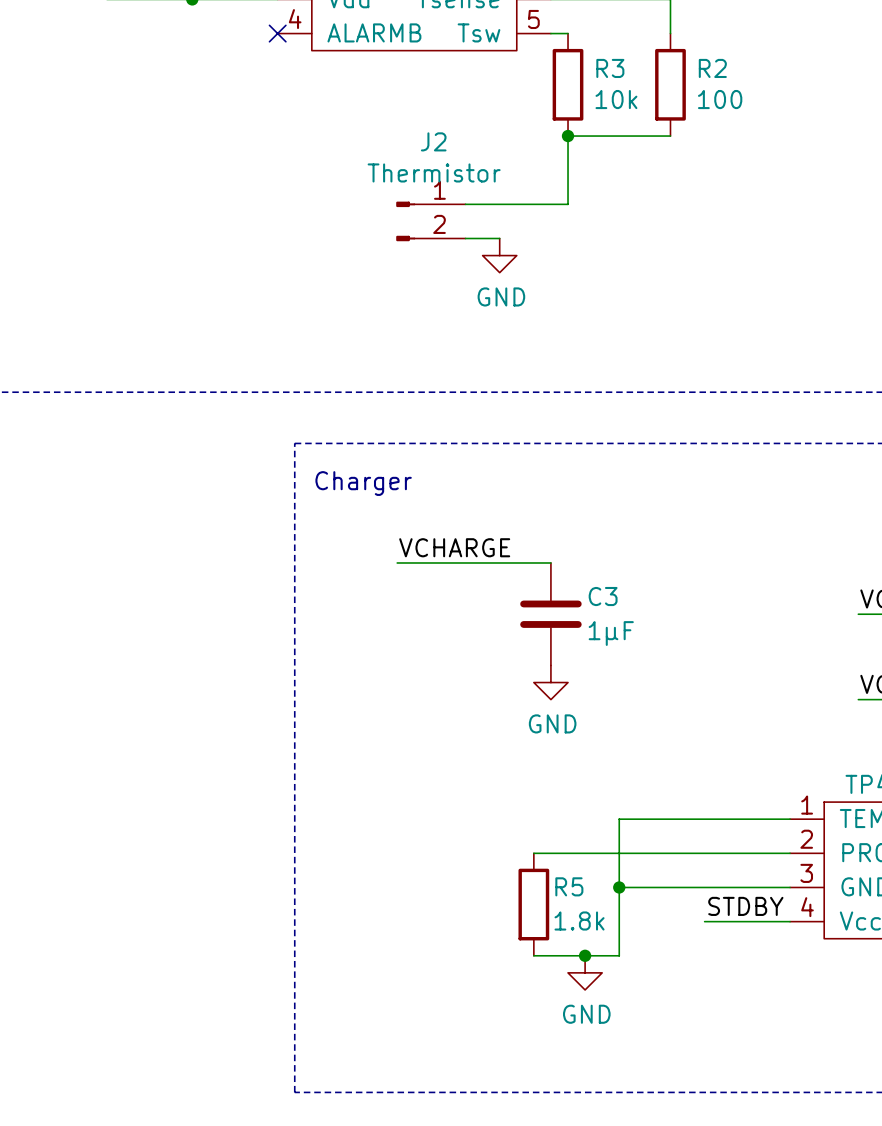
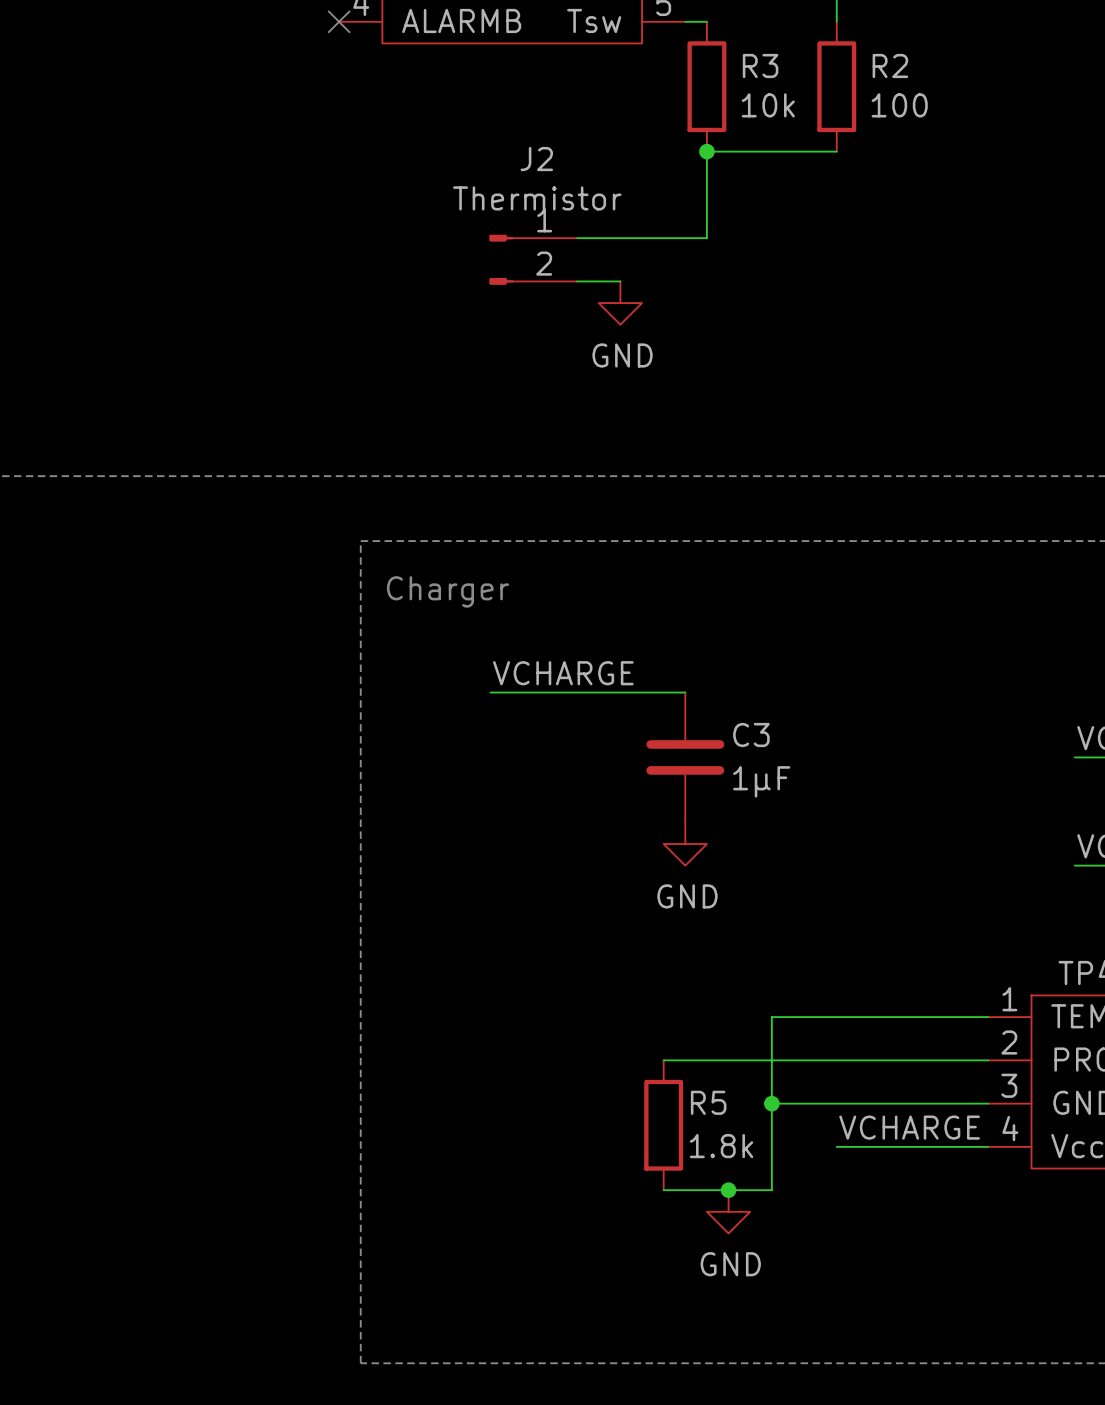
label: none -> VCHARGE (909, 1127)
label: STDBY (745, 906) -> none
wire: none -> (836, 1146) (880, 1146)

